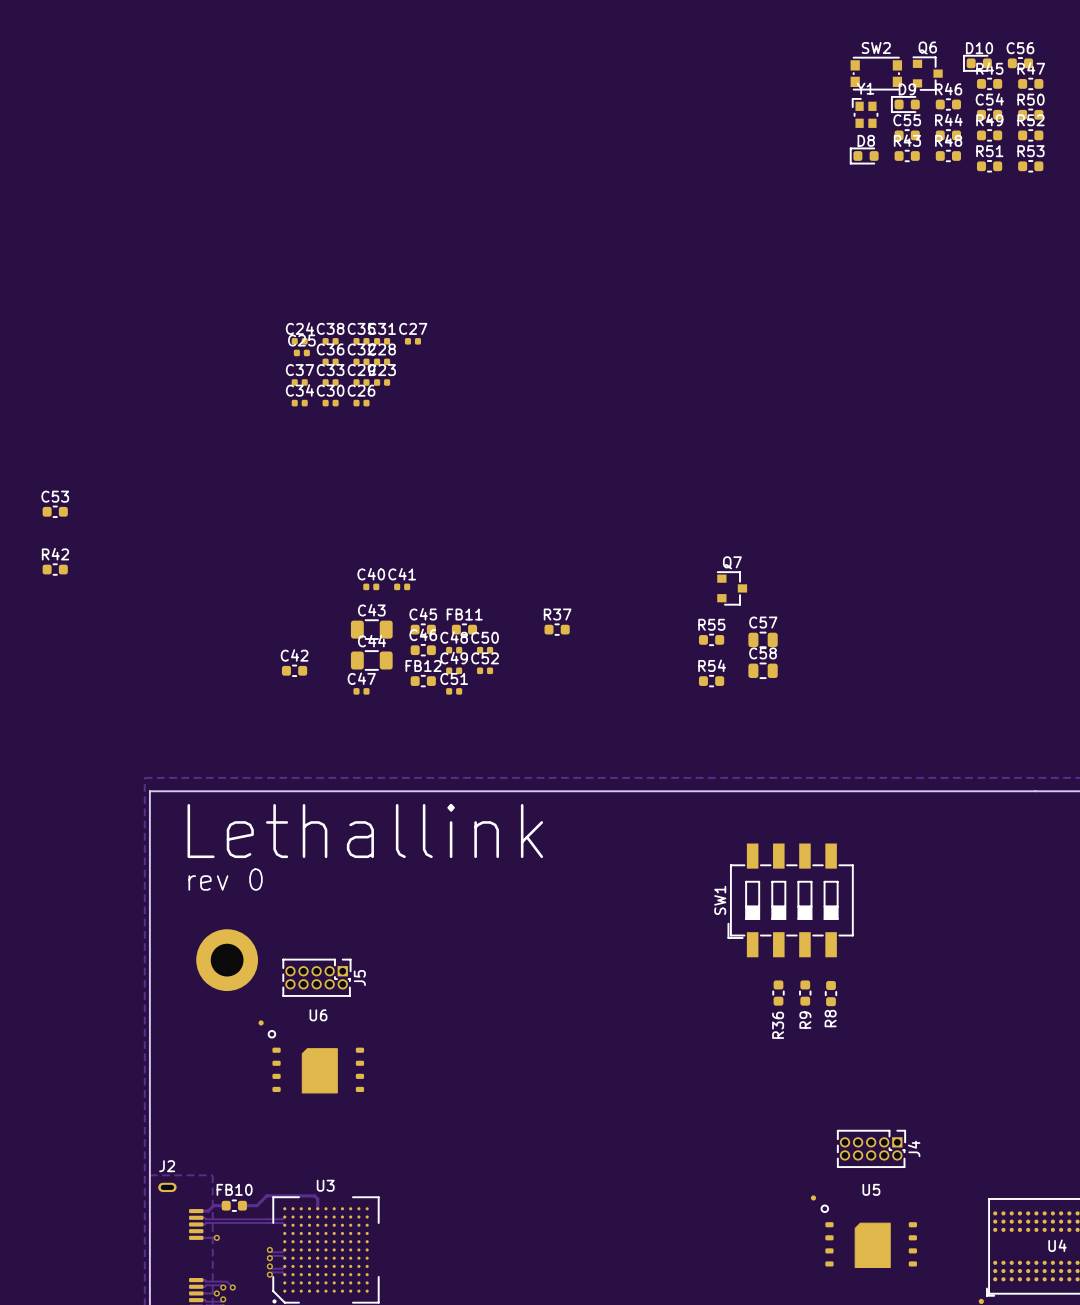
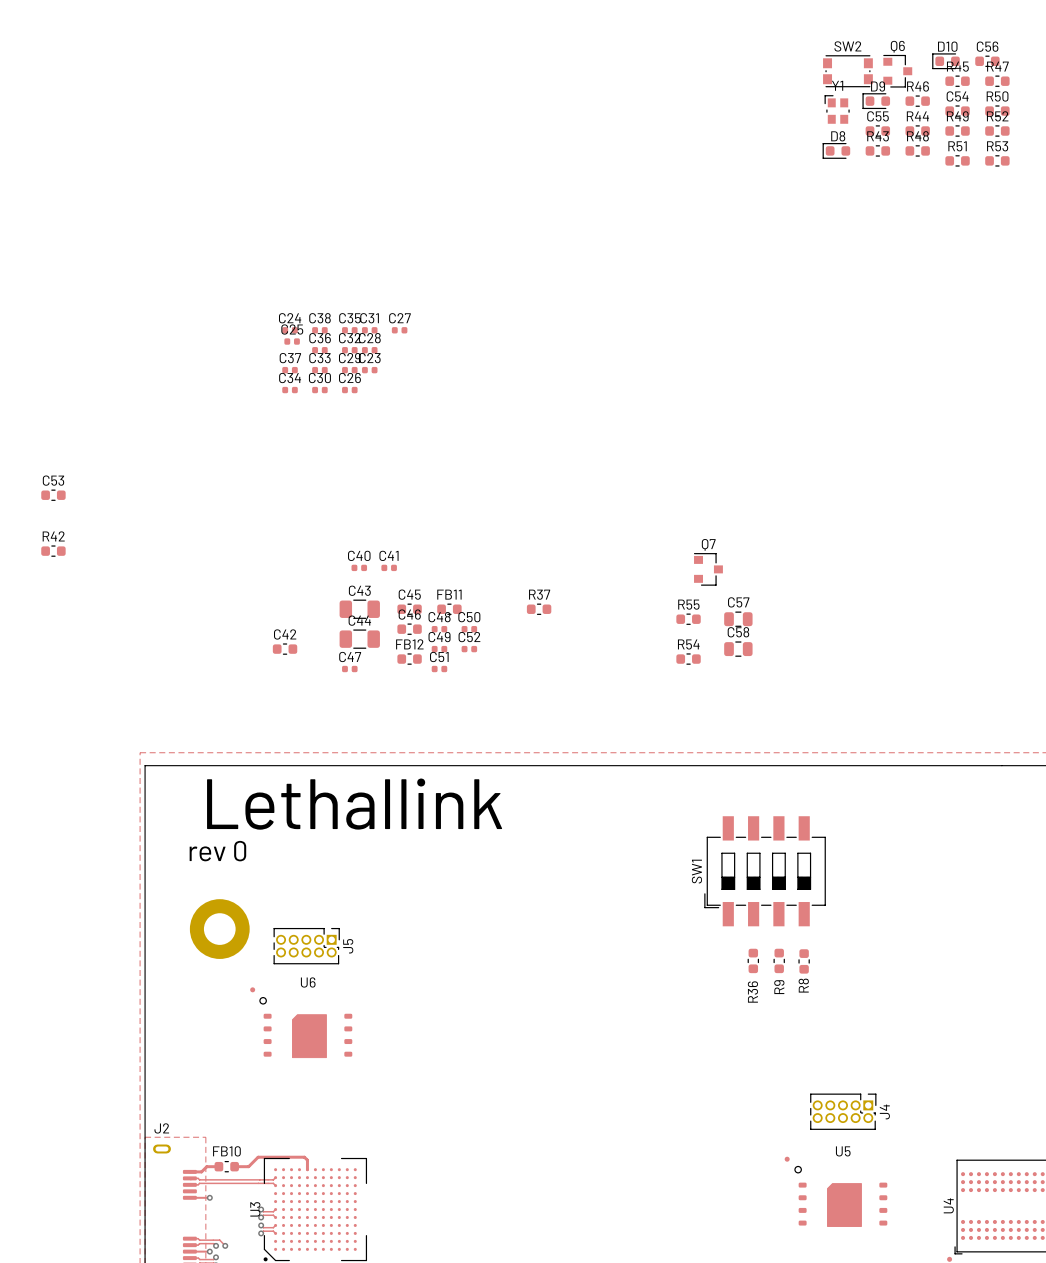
U3 name rotation: 0° (325, 1185) -> 90° counterclockwise (255, 1209)
U3 name position: U3 (325, 1185) -> U3 (255, 1209)
U4 name rotation: 0° (1057, 1245) -> 90° counterclockwise (948, 1205)
U4 name position: U4 (1057, 1245) -> U4 (948, 1205)

